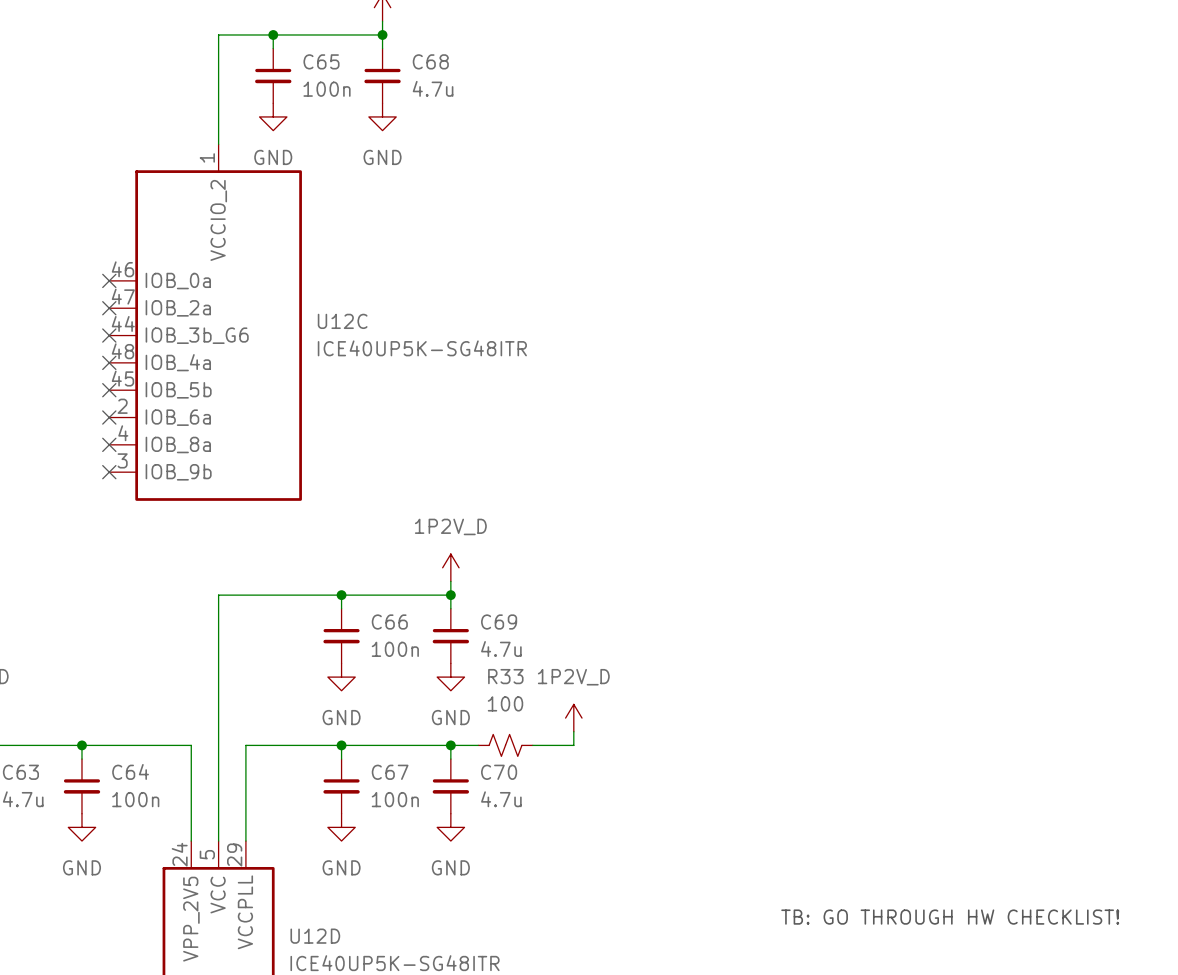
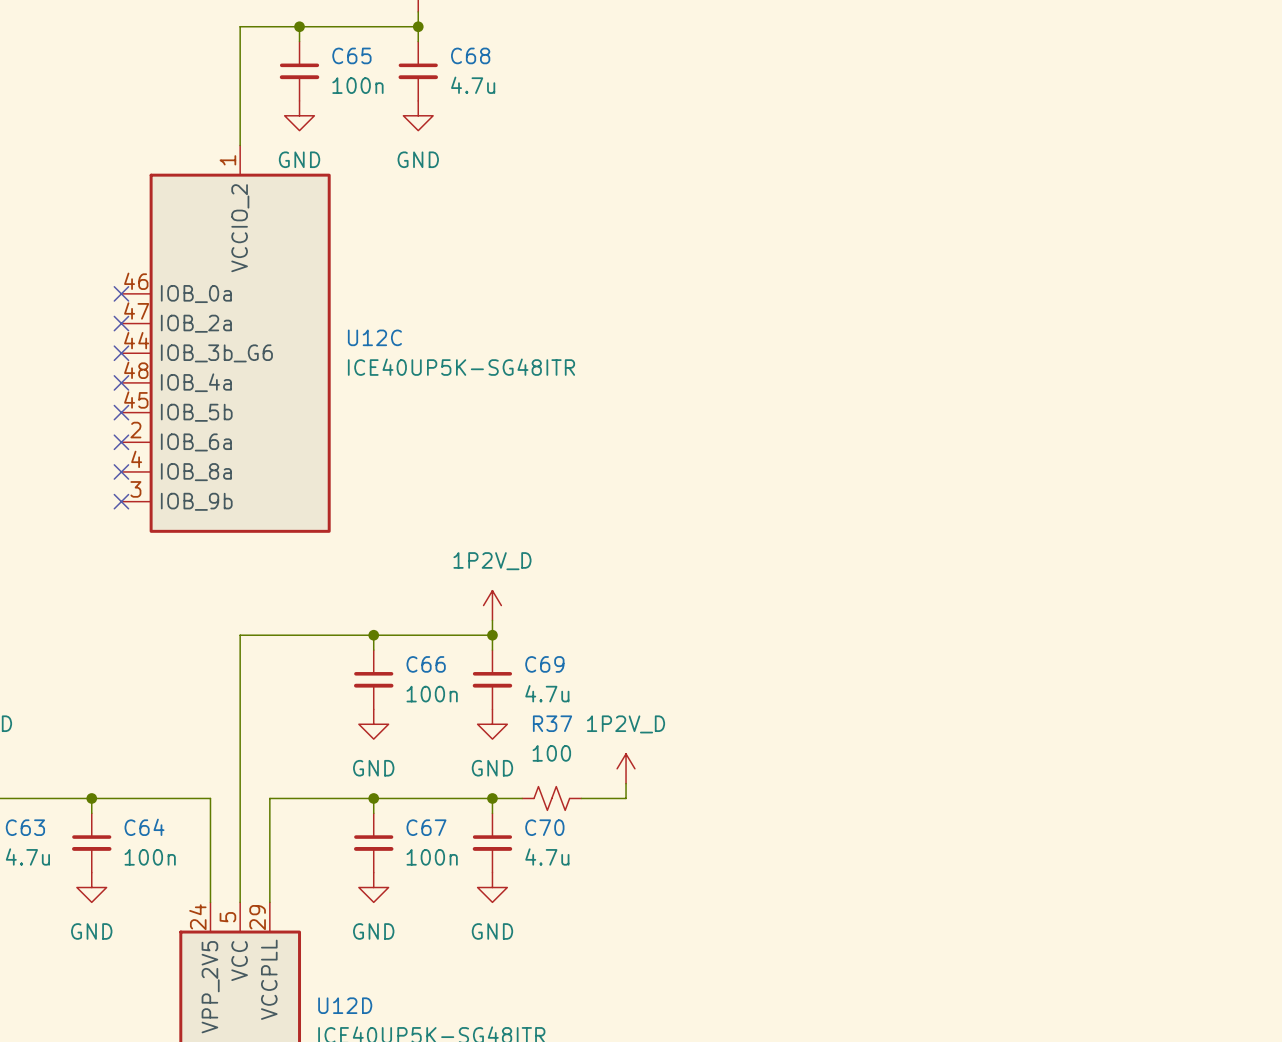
R33 name: R33 (505, 676) -> R37 (552, 723)
text: TB: GO THROUGH HW CHECKLIST! (950, 917) -> none

